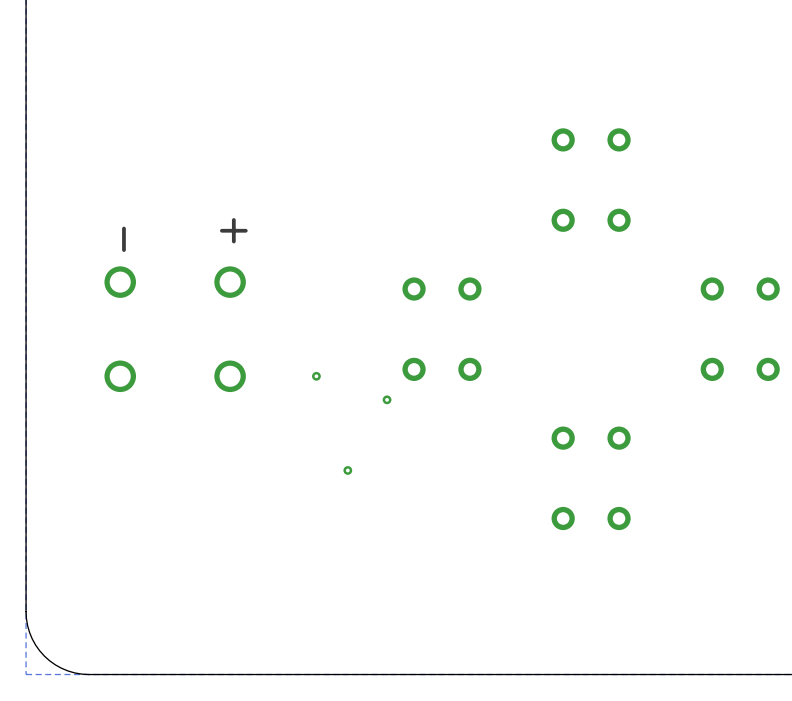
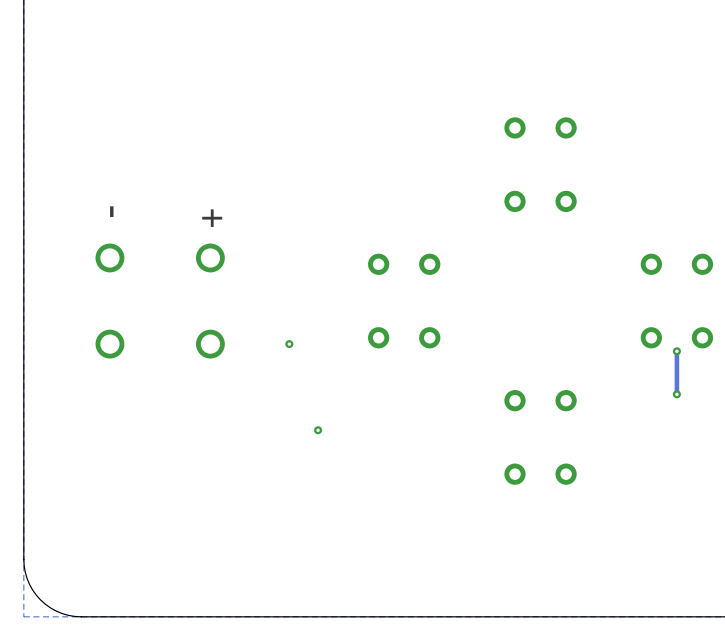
track: none -> (676, 351) (676, 394)
via: none -> (676, 351)
via: (387, 399) -> none
via: none -> (676, 394)

